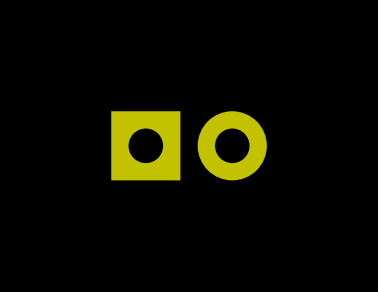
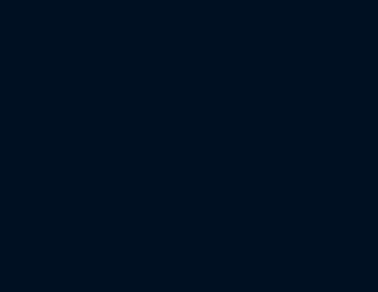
part: (189, 145) -> none

